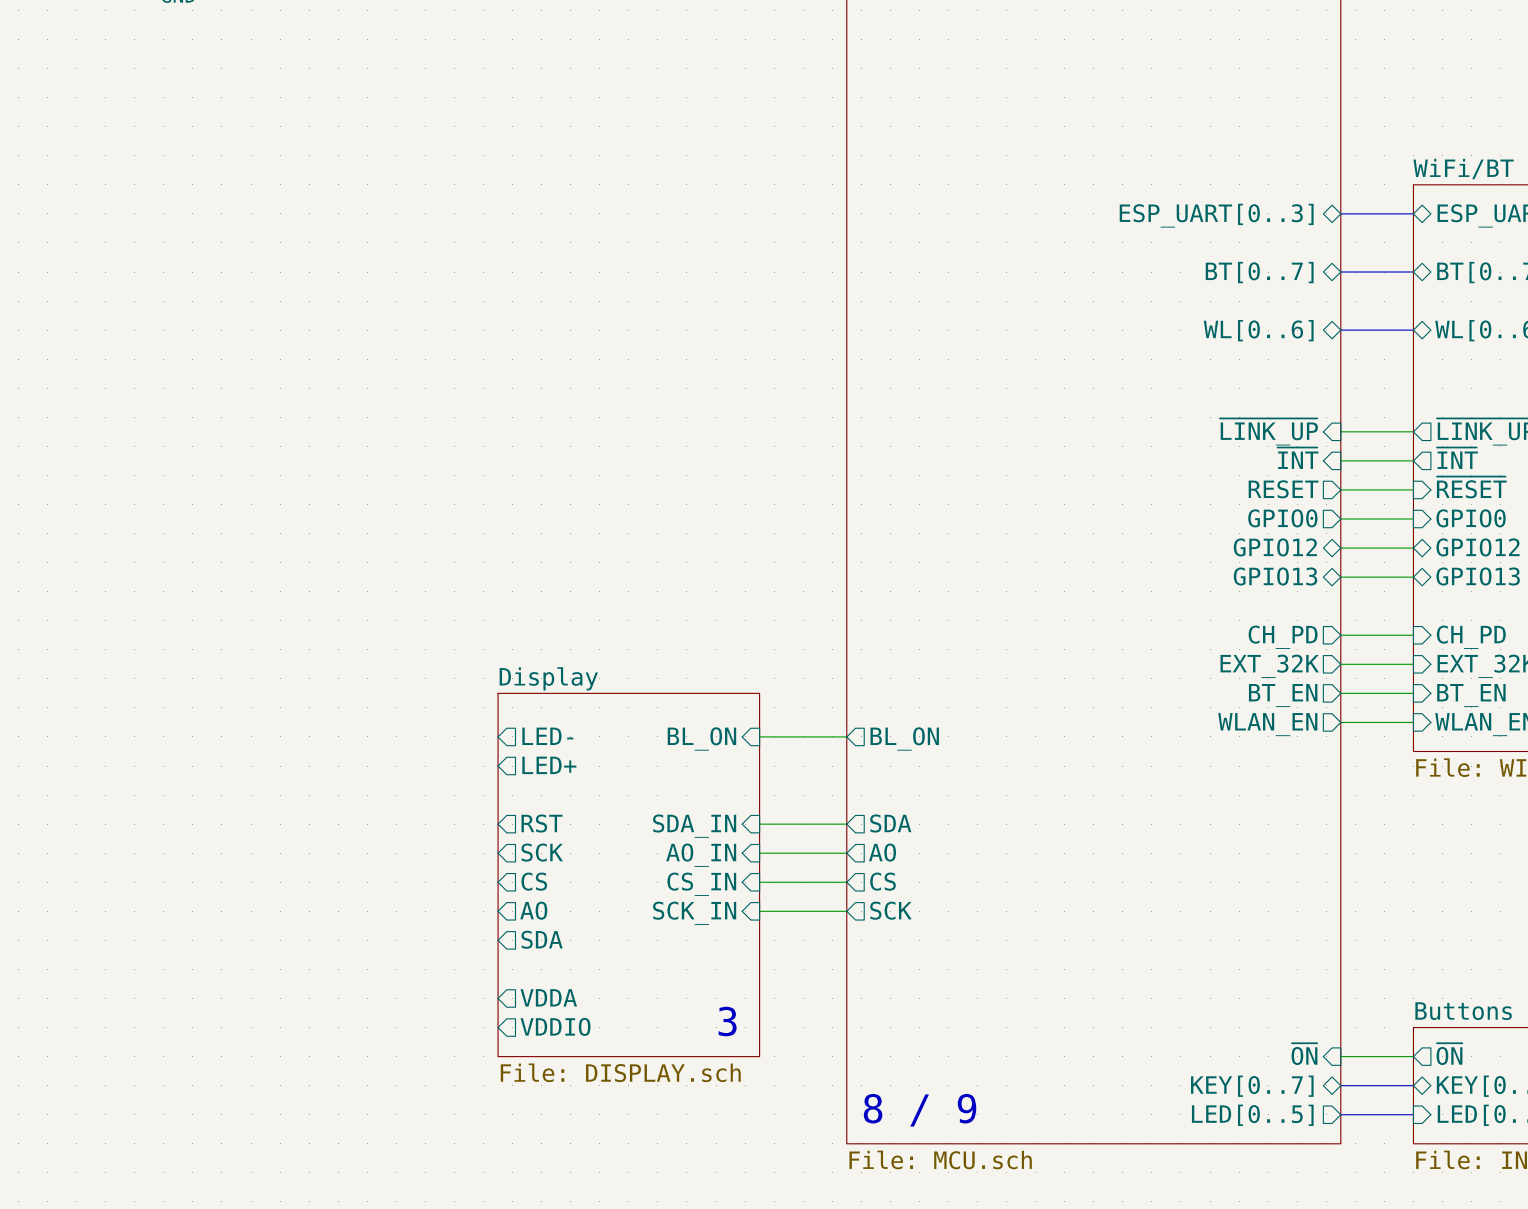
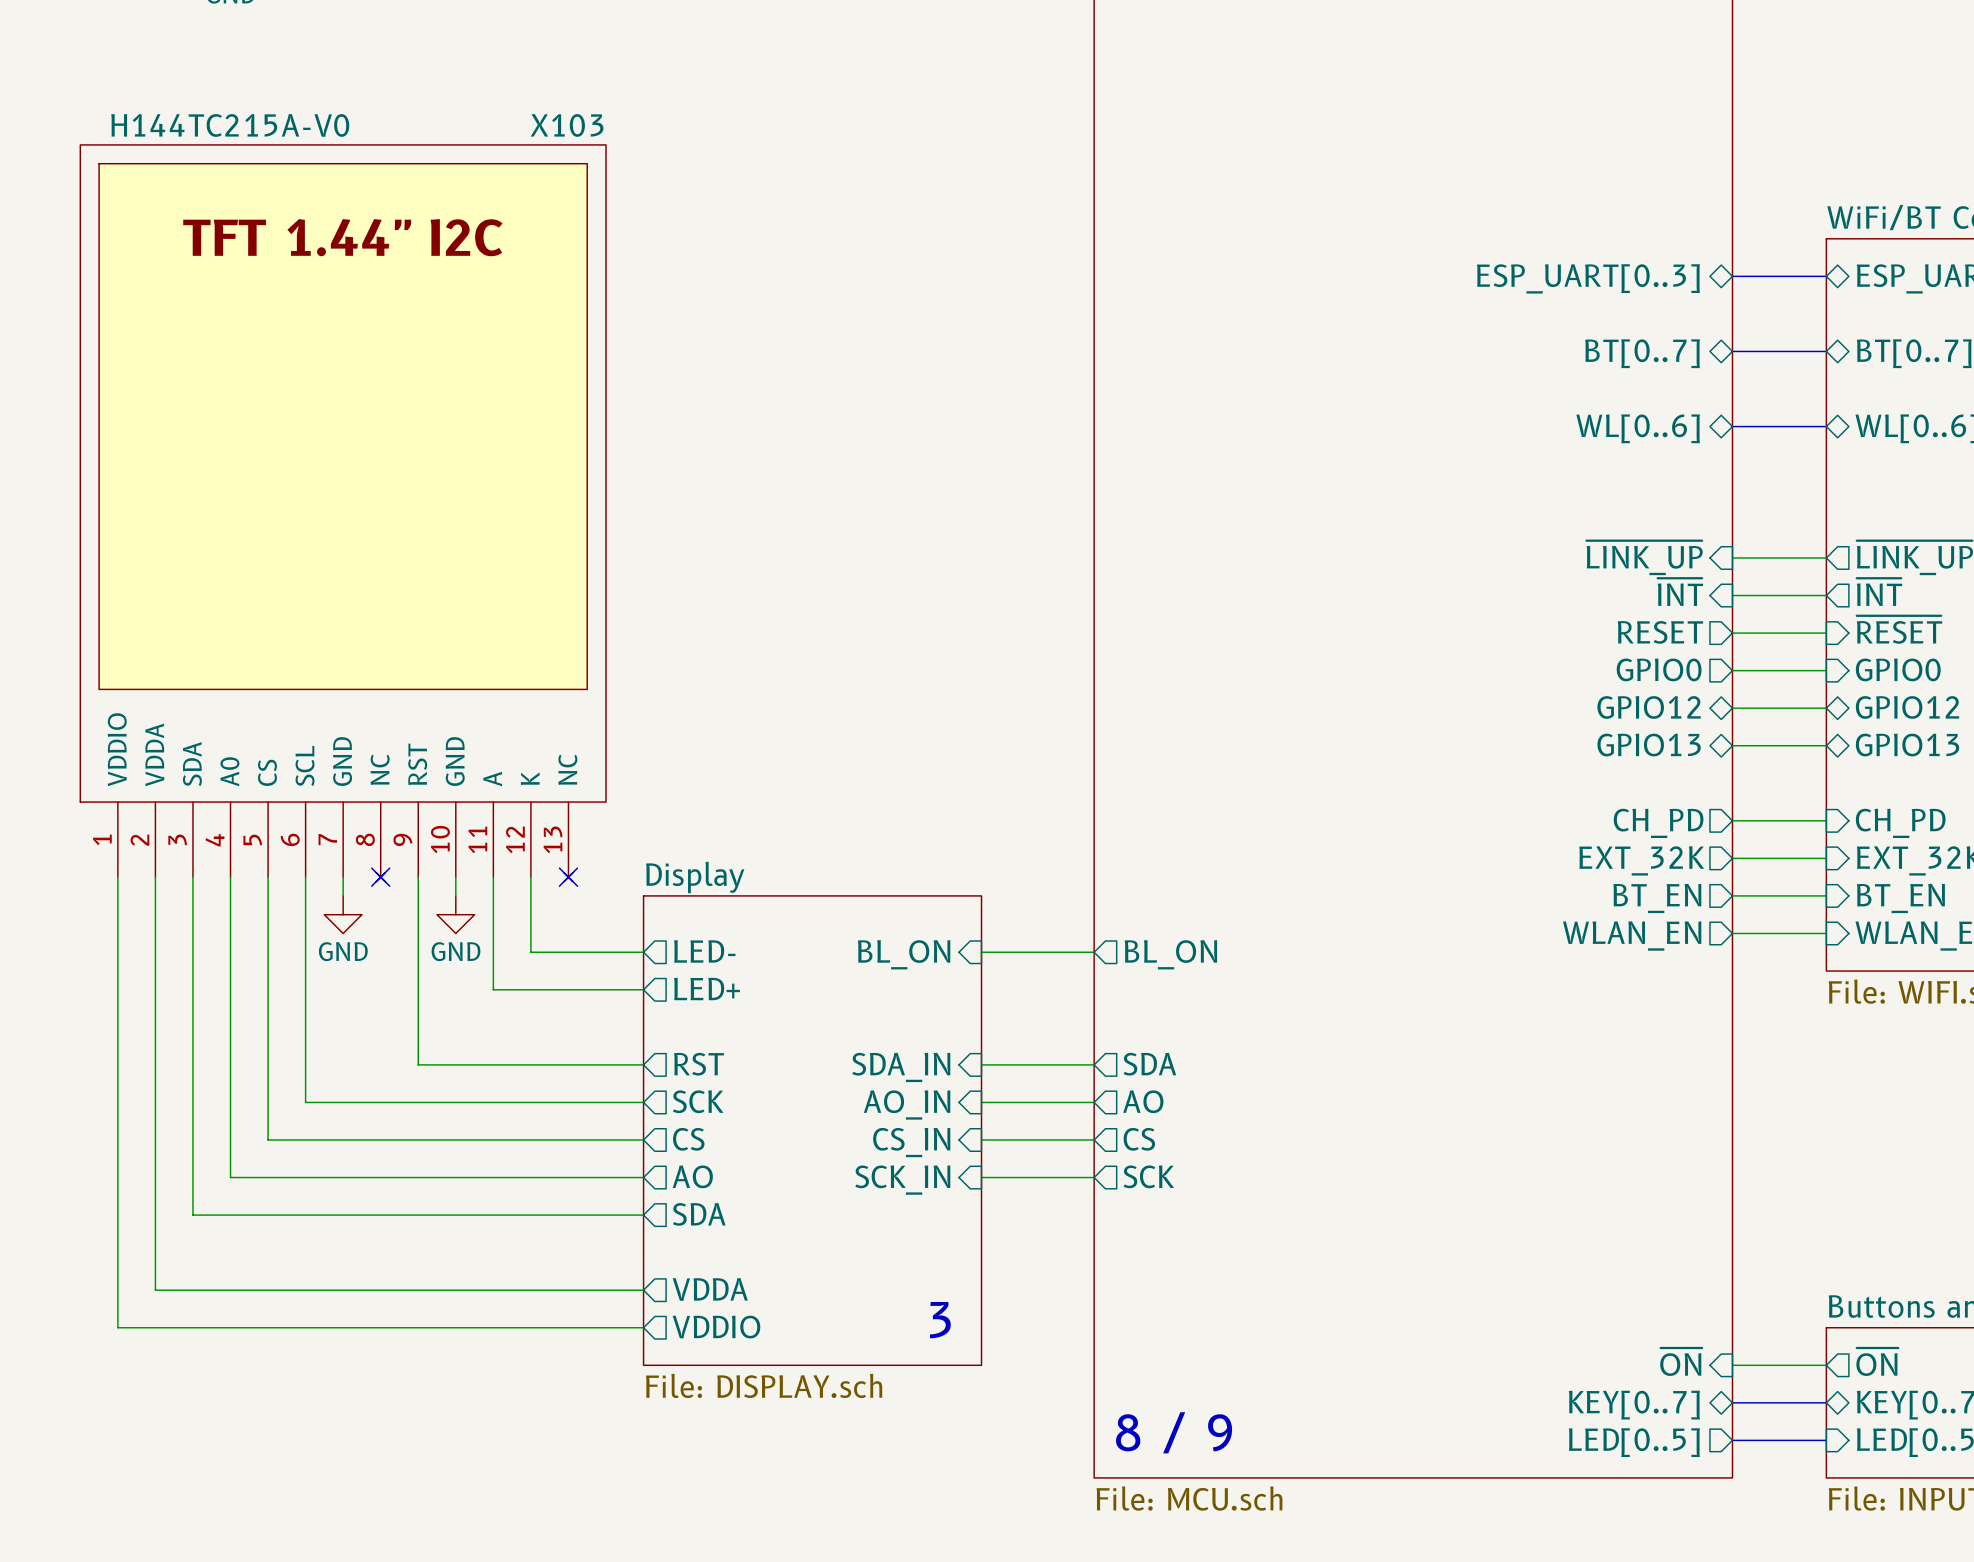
X103: none -> H144TC215A-V0 (343, 513)
wire: none -> (117, 877) (117, 1327) (643, 1327)
wire: none -> (155, 877) (155, 1290) (643, 1290)
wire: none -> (192, 877) (192, 1215) (643, 1215)
wire: none -> (230, 877) (230, 1177) (643, 1177)
wire: none -> (268, 877) (268, 1140) (643, 1140)
wire: none -> (305, 877) (305, 1102) (643, 1102)
wire: none -> (343, 877) (343, 895)
no-connect mark: none -> (380, 877)
wire: none -> (418, 877) (418, 1064) (643, 1064)
wire: none -> (455, 877) (455, 895)
wire: none -> (493, 877) (493, 989) (643, 989)
wire: none -> (530, 877) (530, 952) (643, 952)
no-connect mark: none -> (568, 877)
power symbol: none -> GND (343, 914)
power symbol: none -> GND (455, 914)

